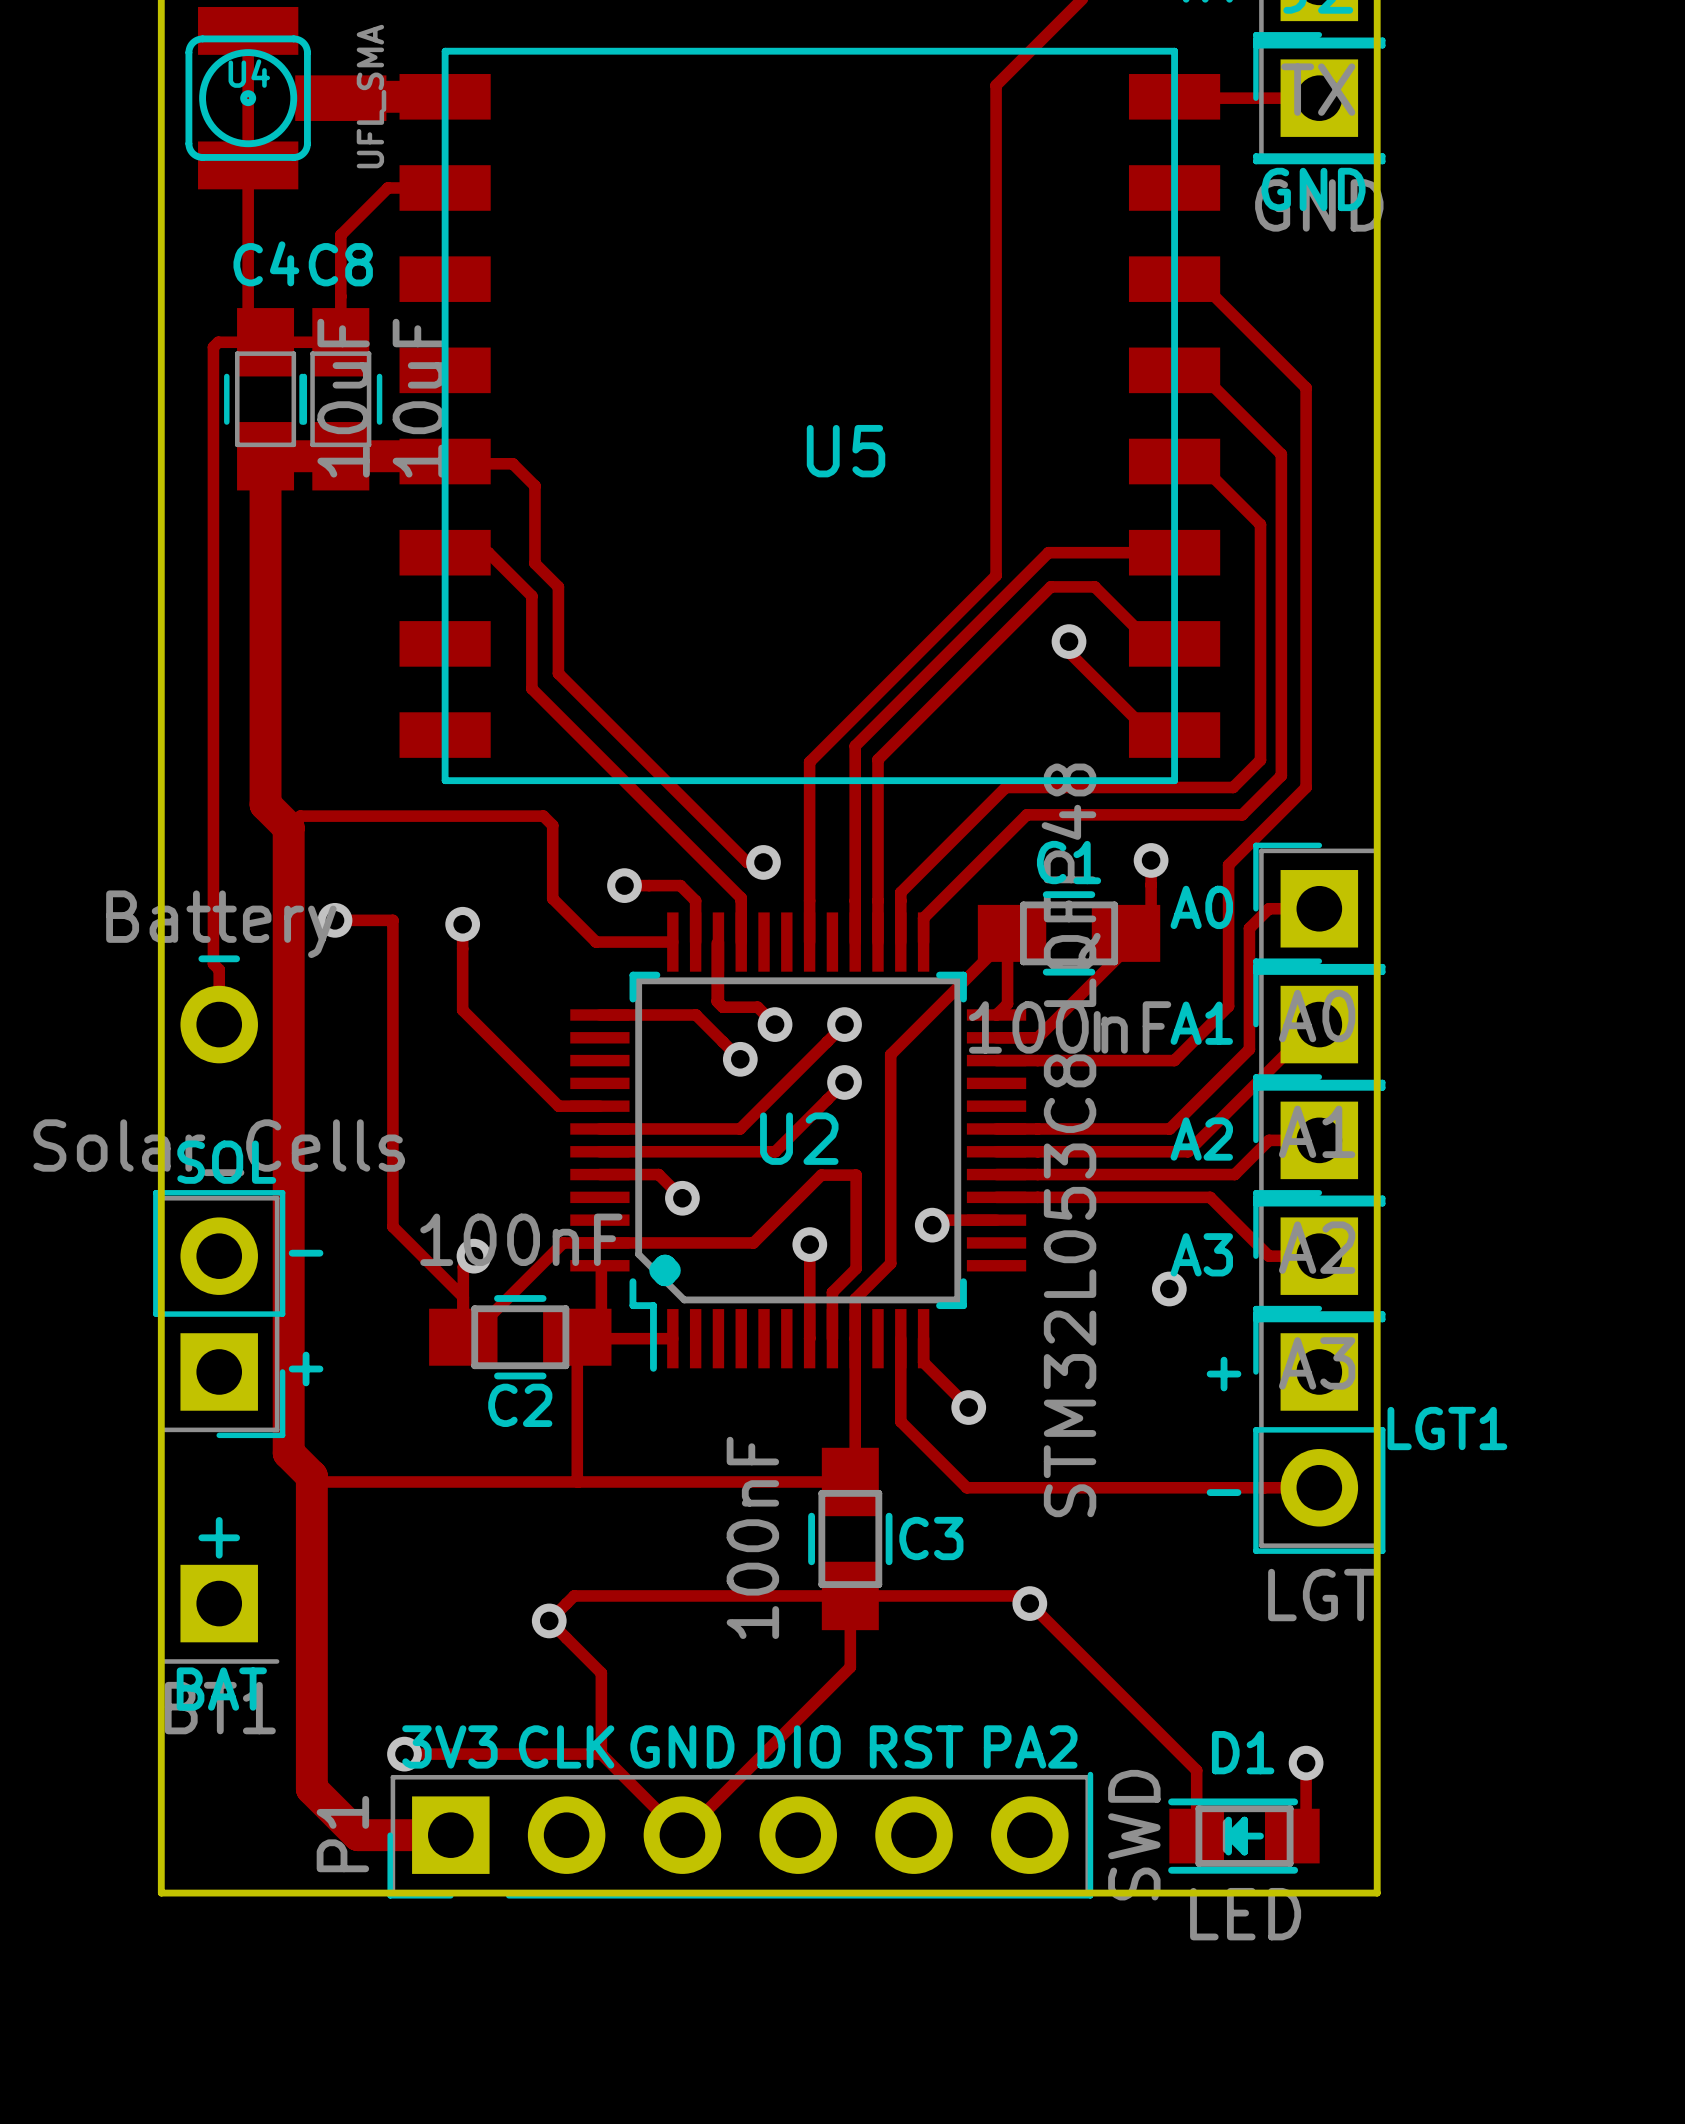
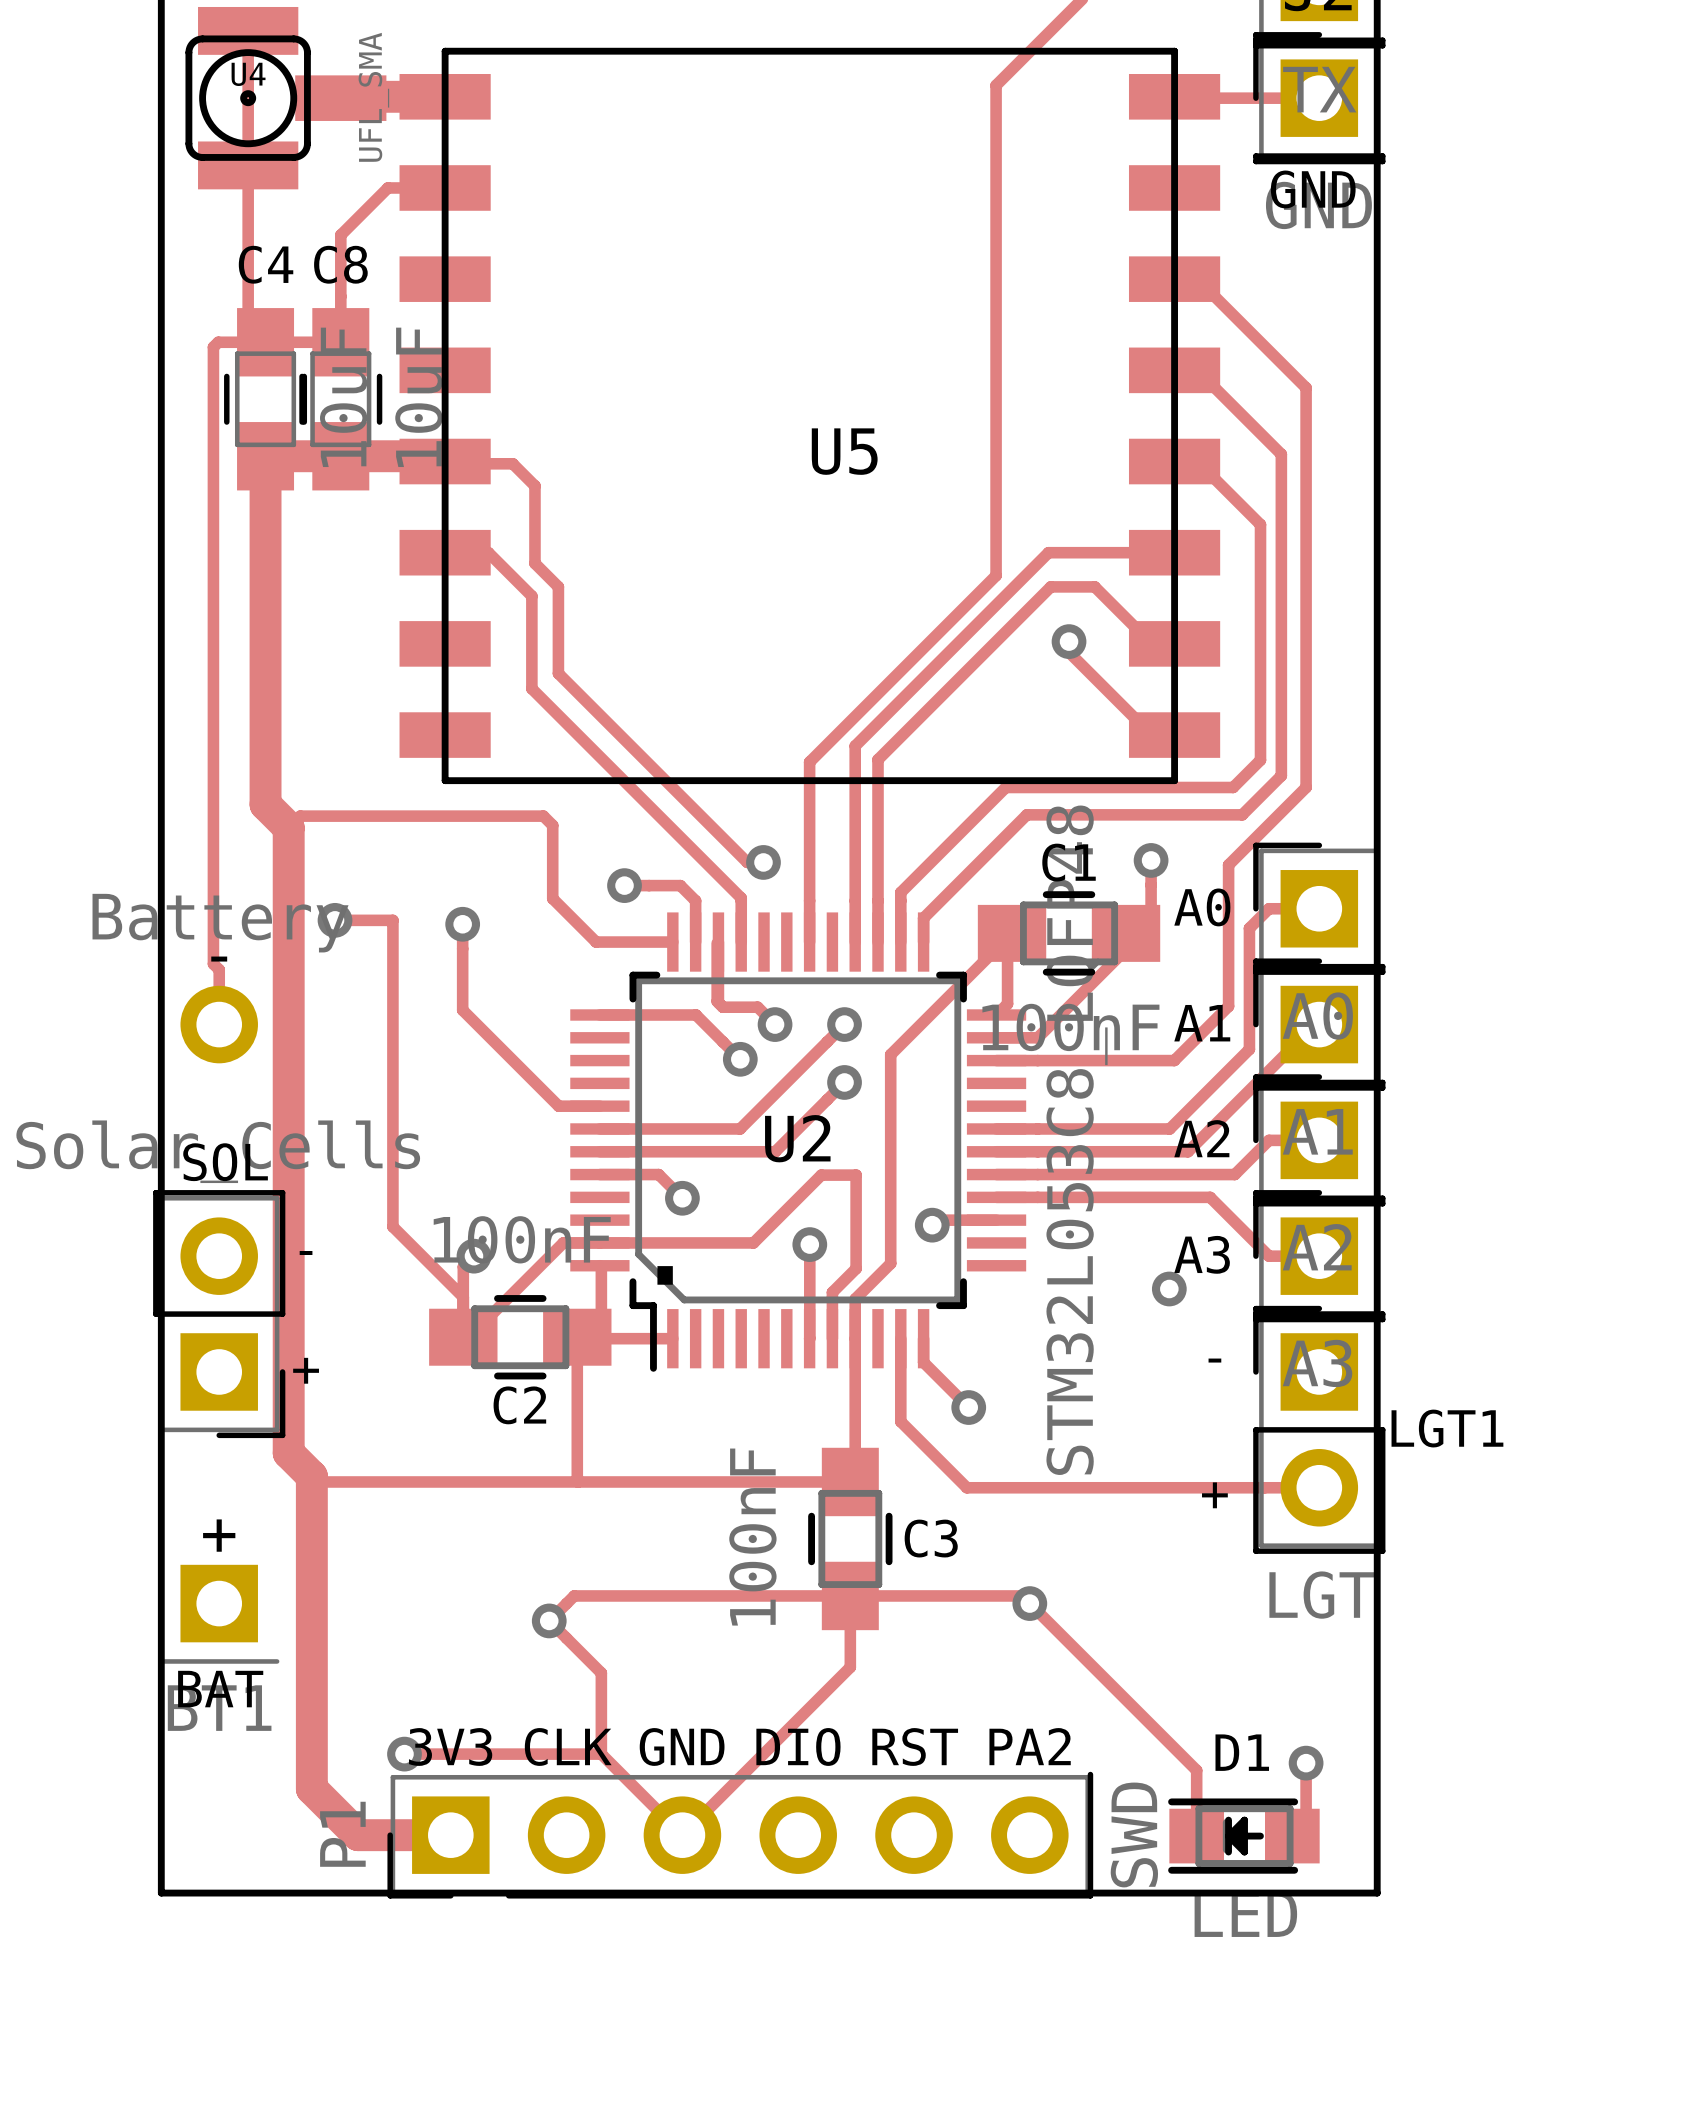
text position: + (1224, 1374) -> + (1214, 1495)
text position: - (1224, 1492) -> - (1214, 1360)

